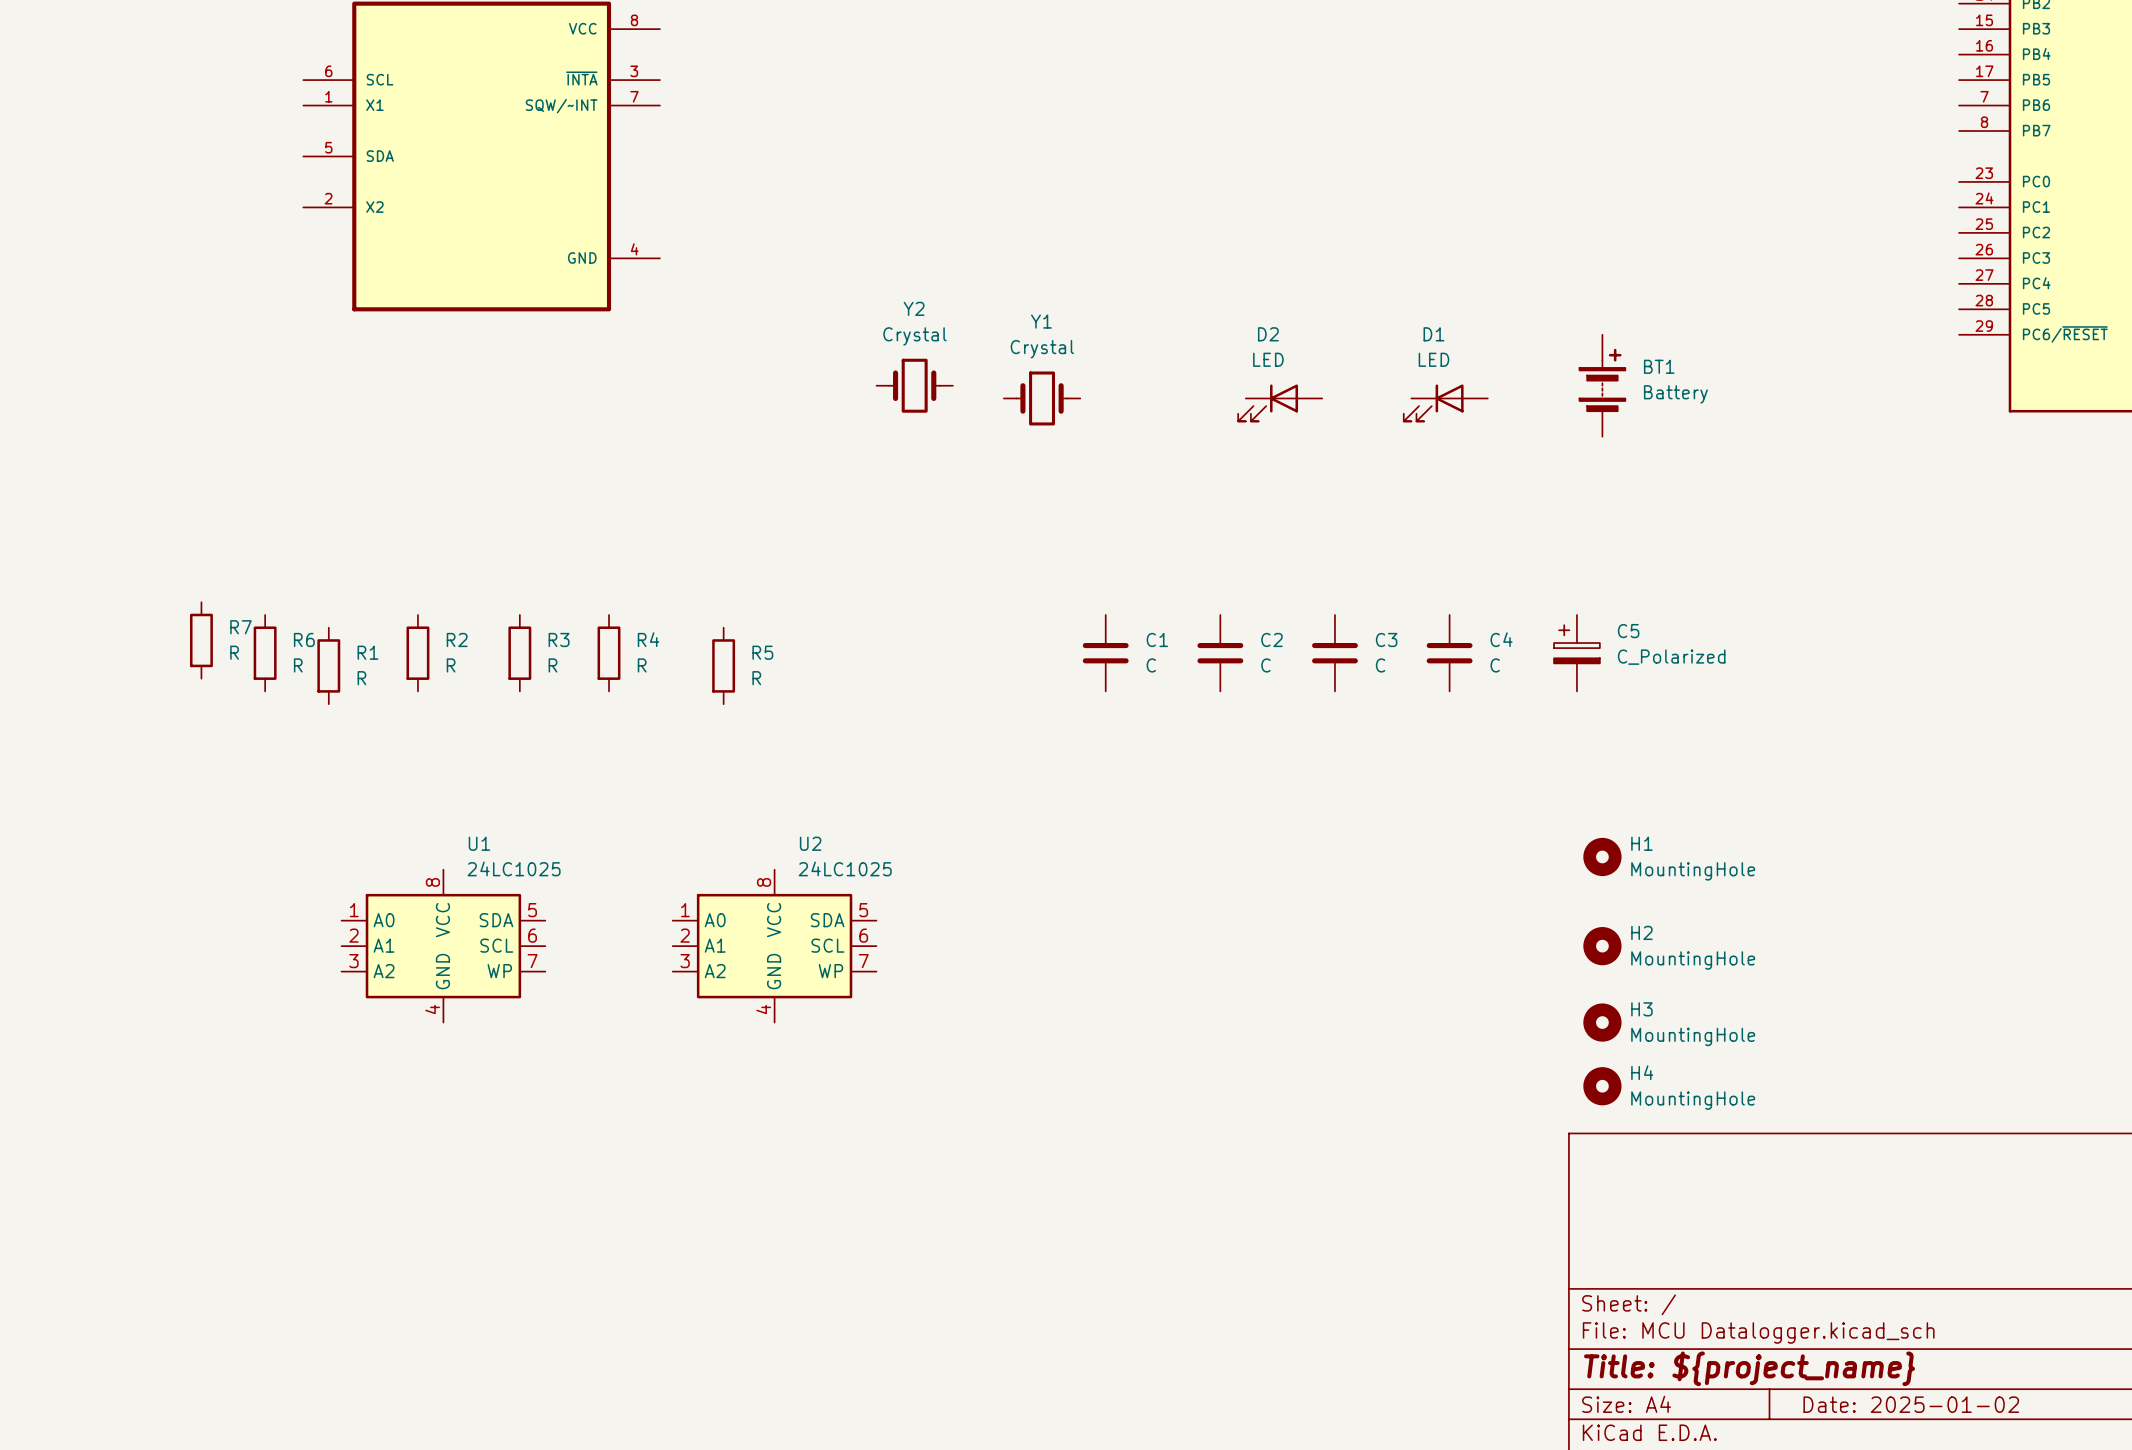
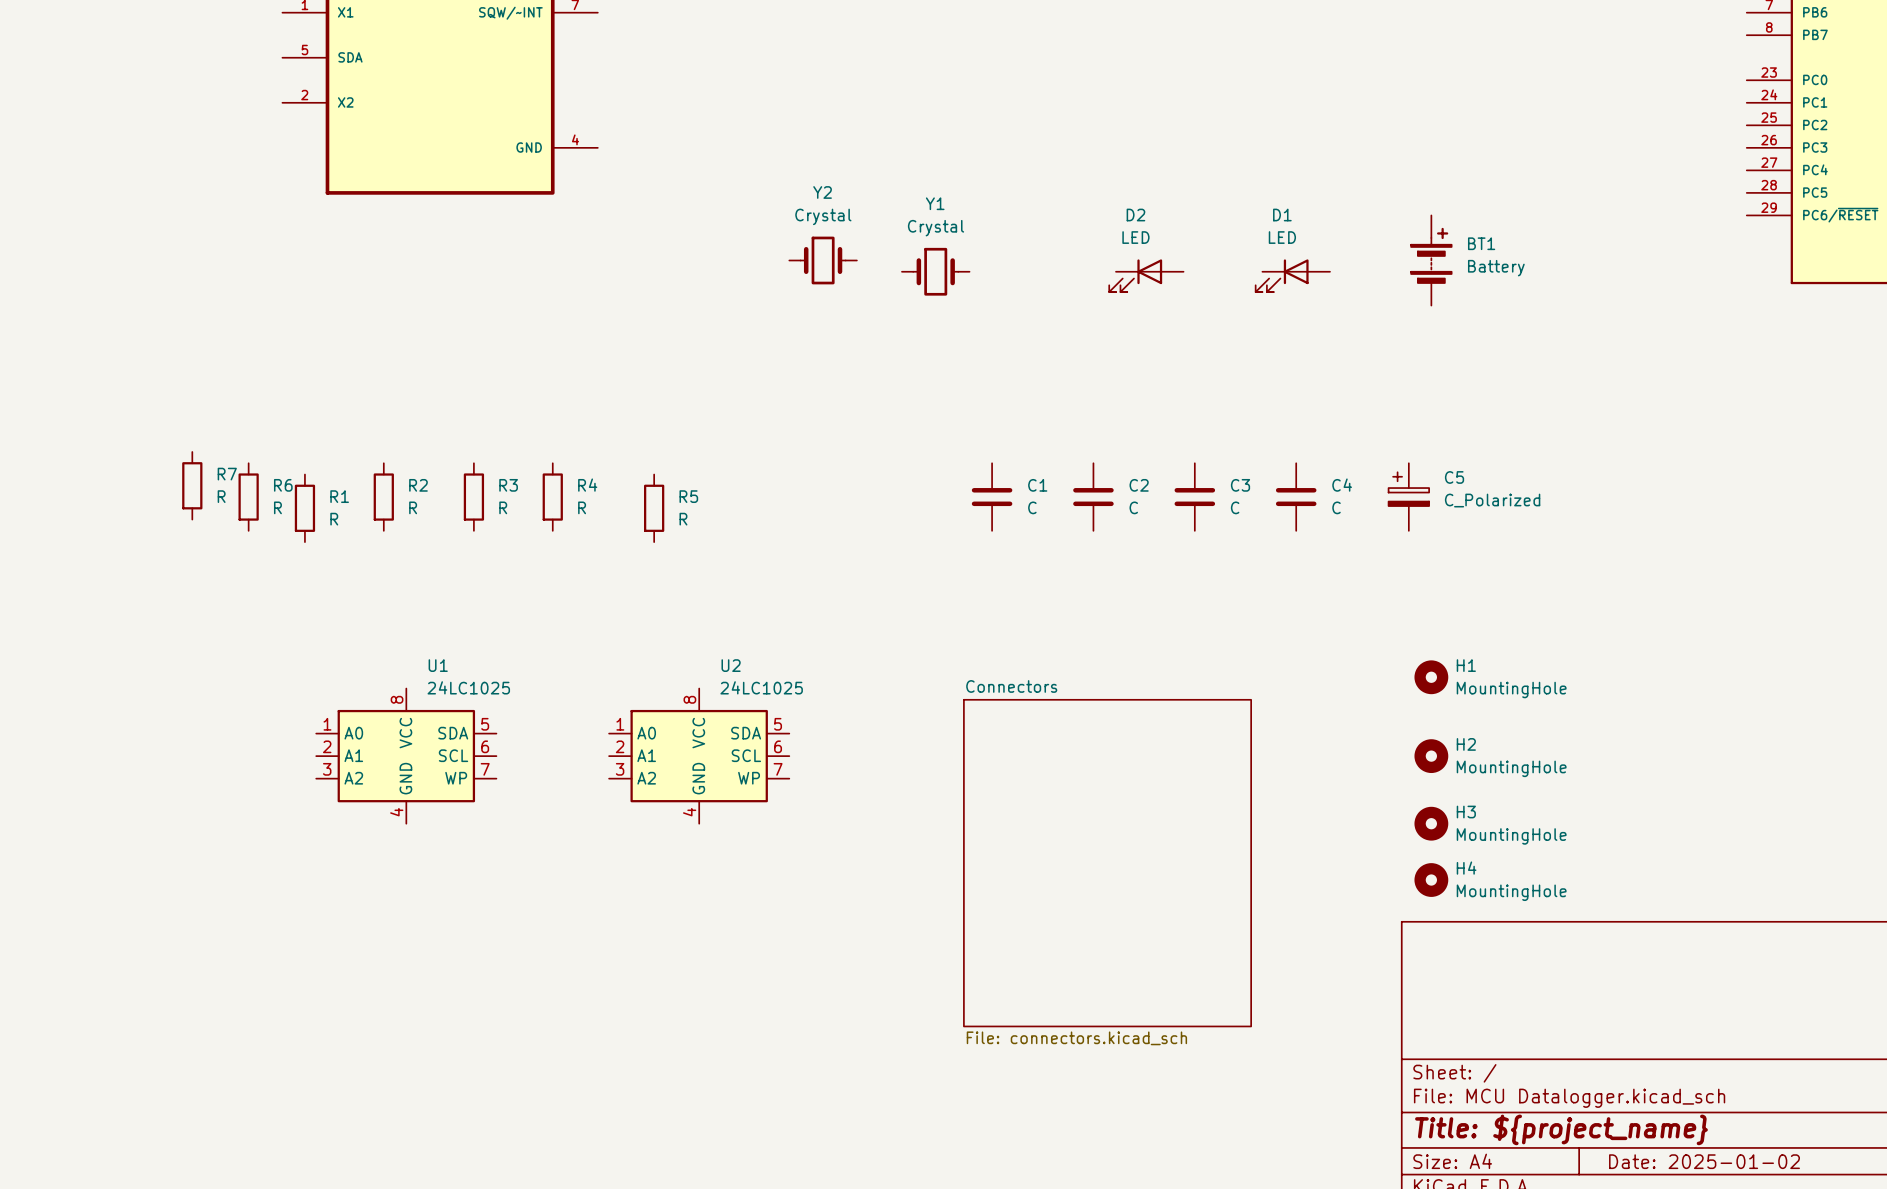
sheet Connectors: none -> File: connectors.kicad_sch (1107, 863)

